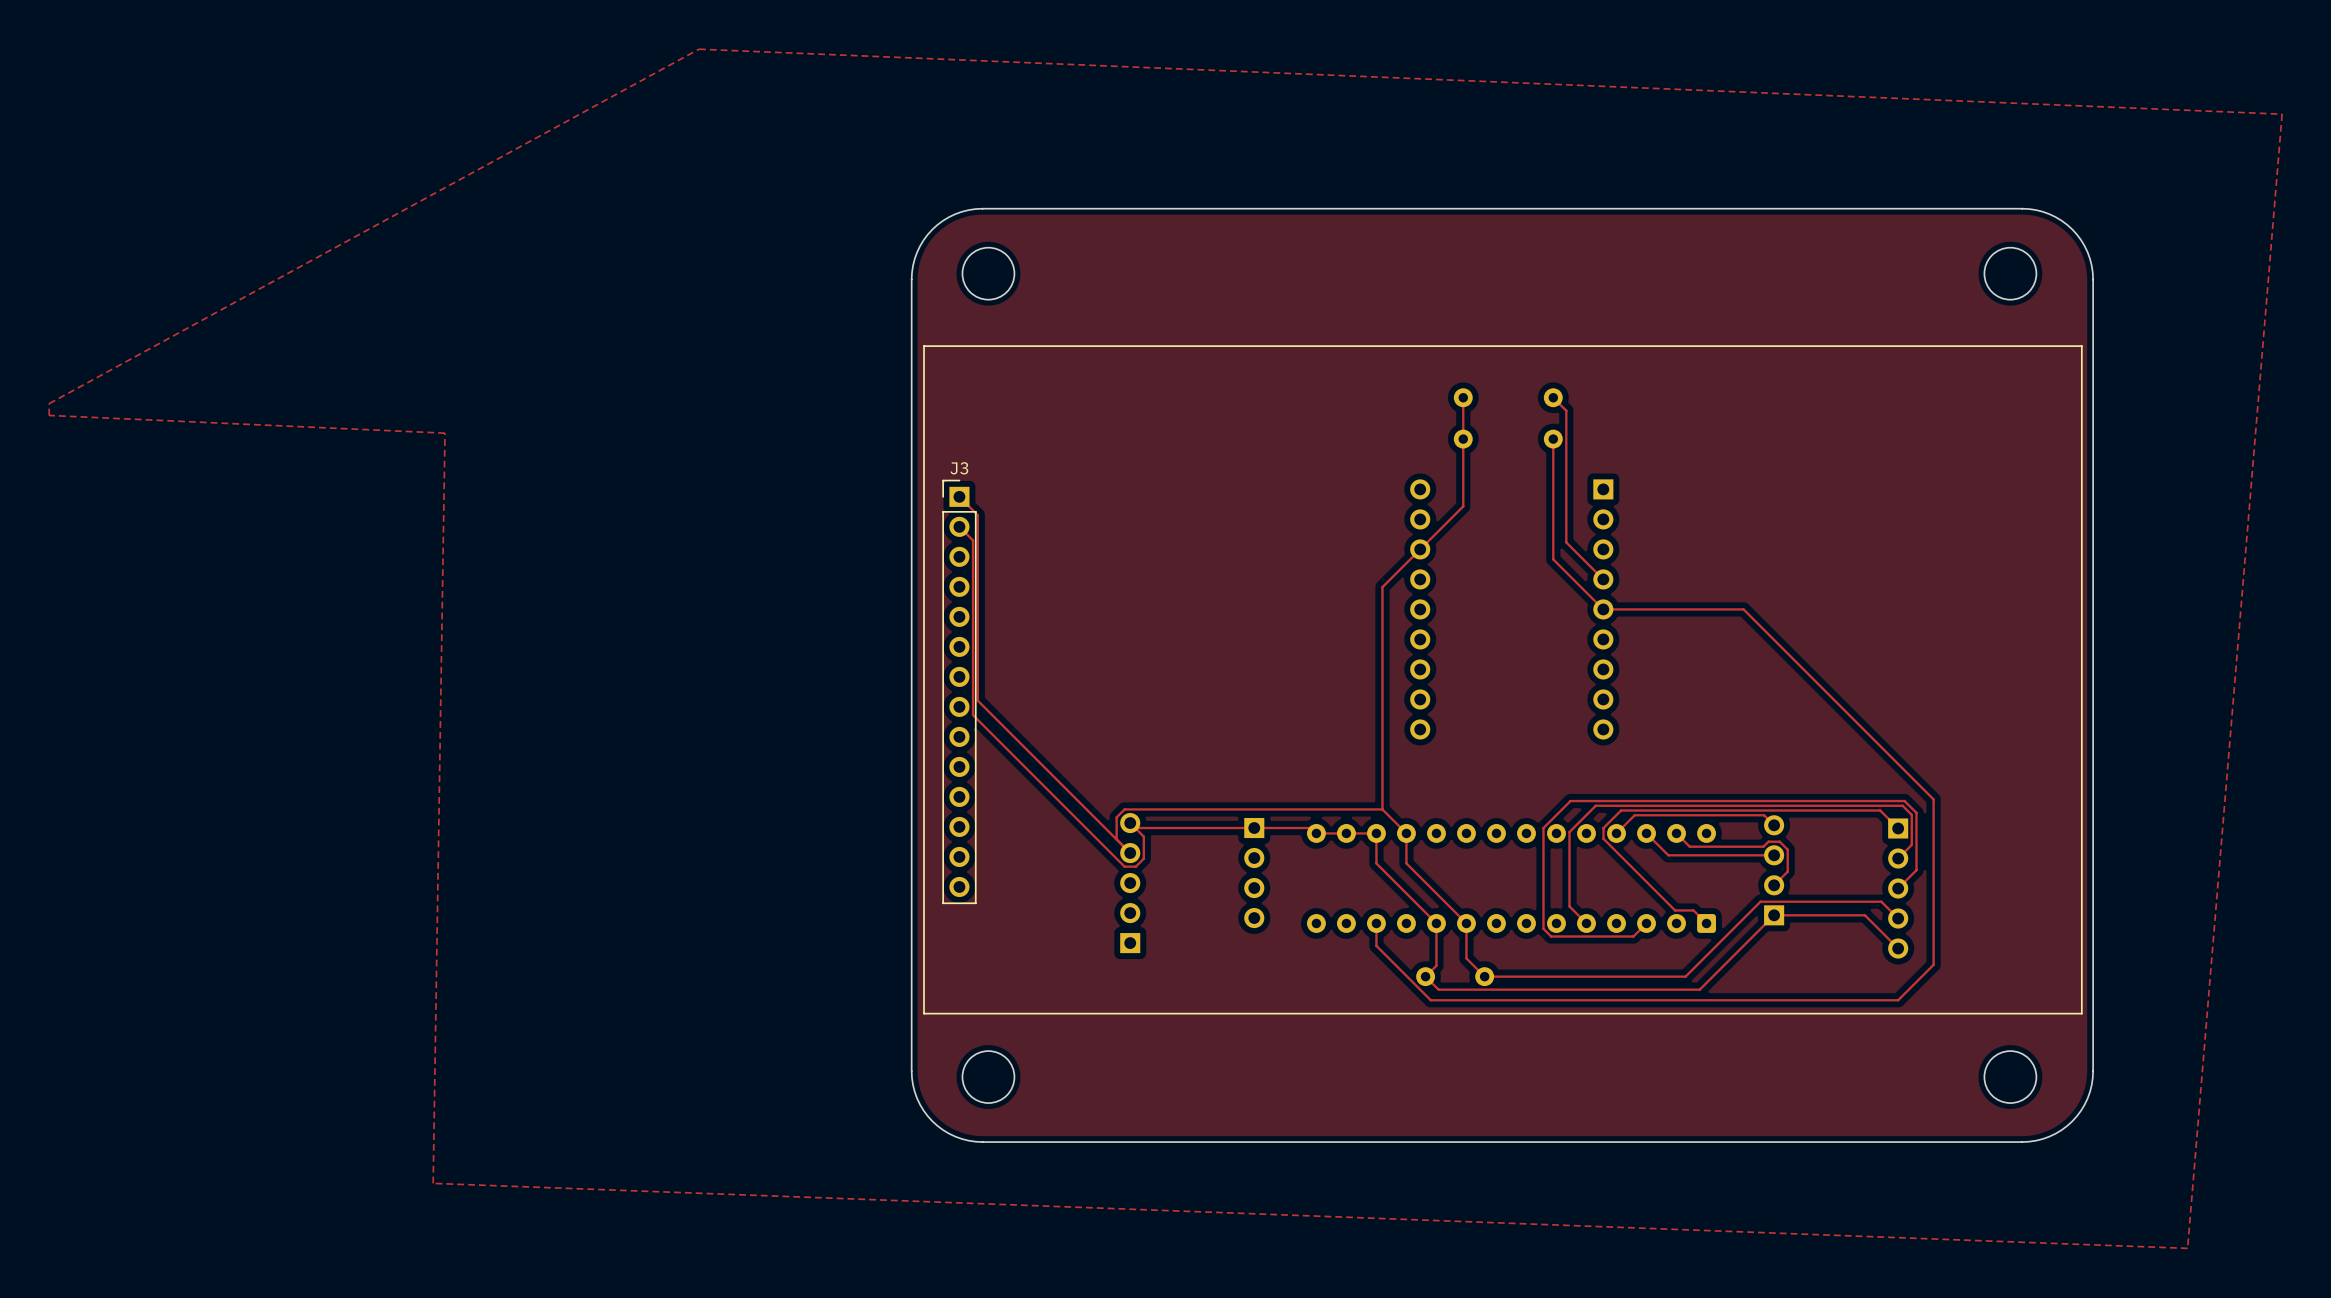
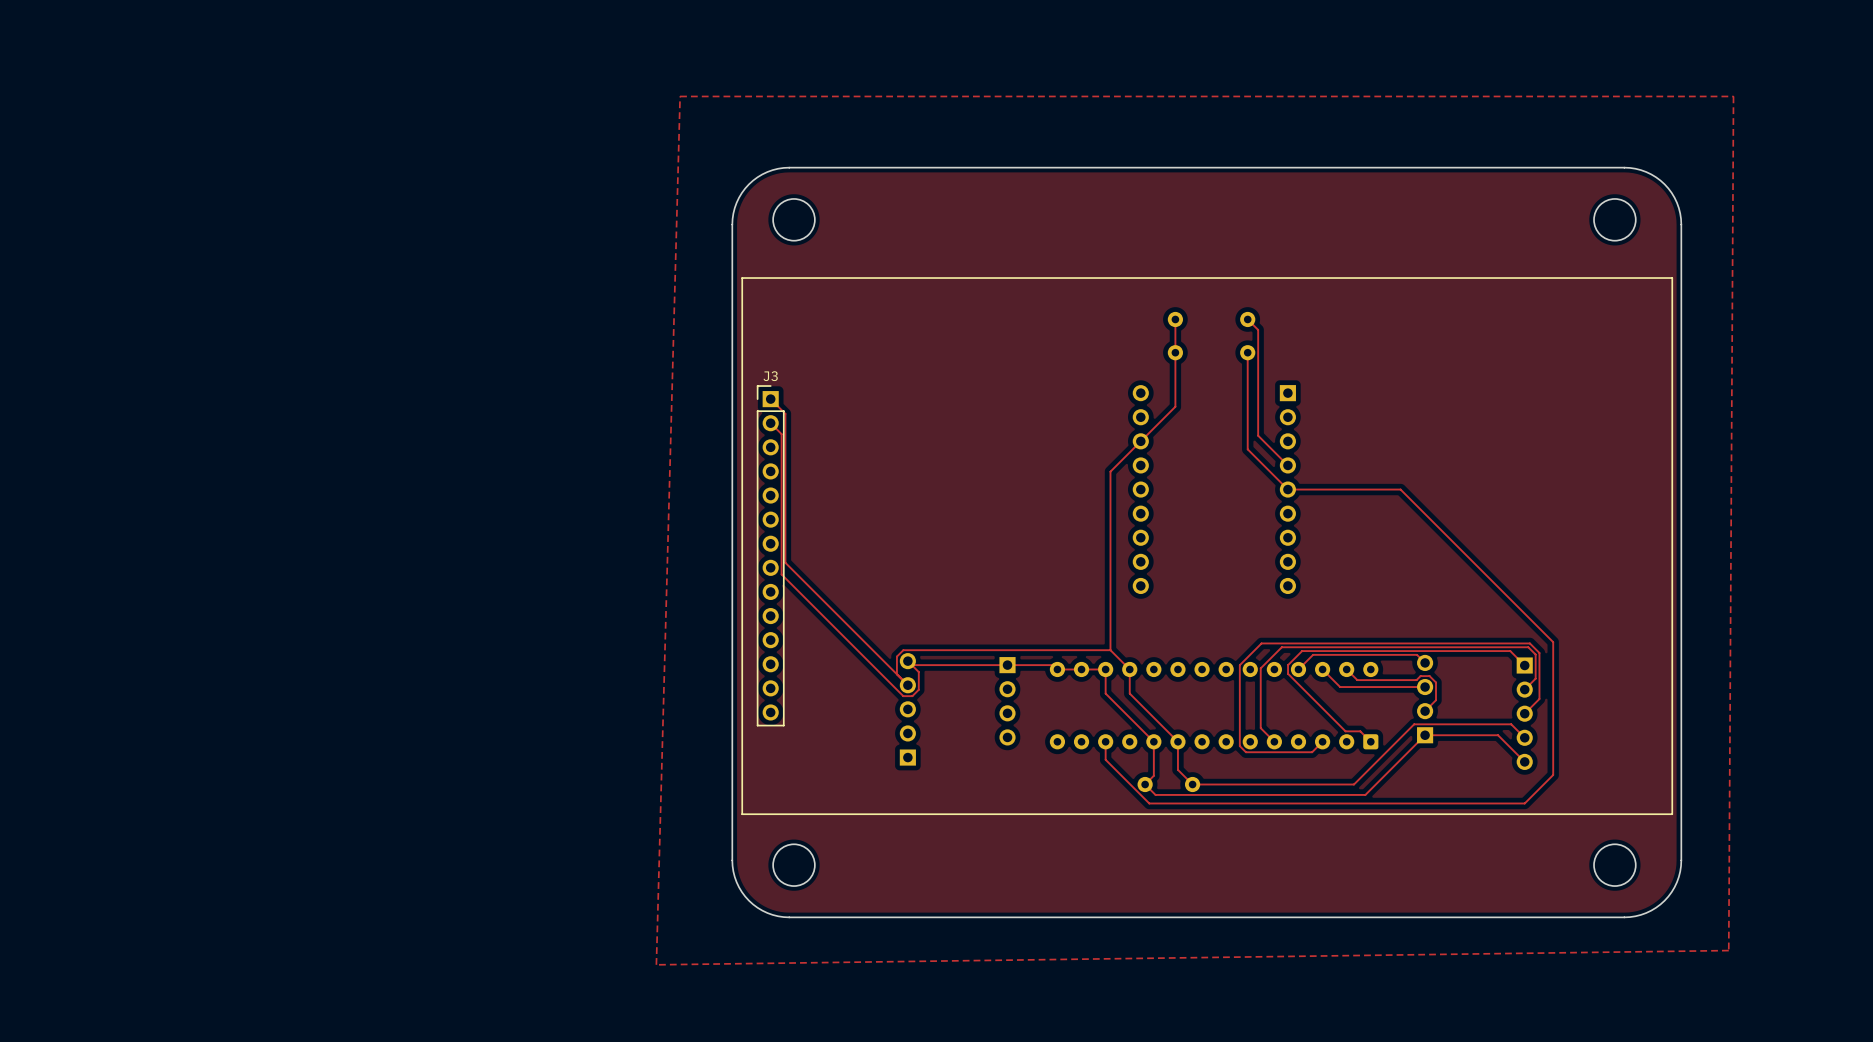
zone outline: (699, 49) (49, 403) (49, 415) (444, 433) (433, 1183) (2187, 1248) (2282, 114) (699, 49) -> (680, 96) (656, 964) (1728, 950) (1733, 96) (680, 96)

